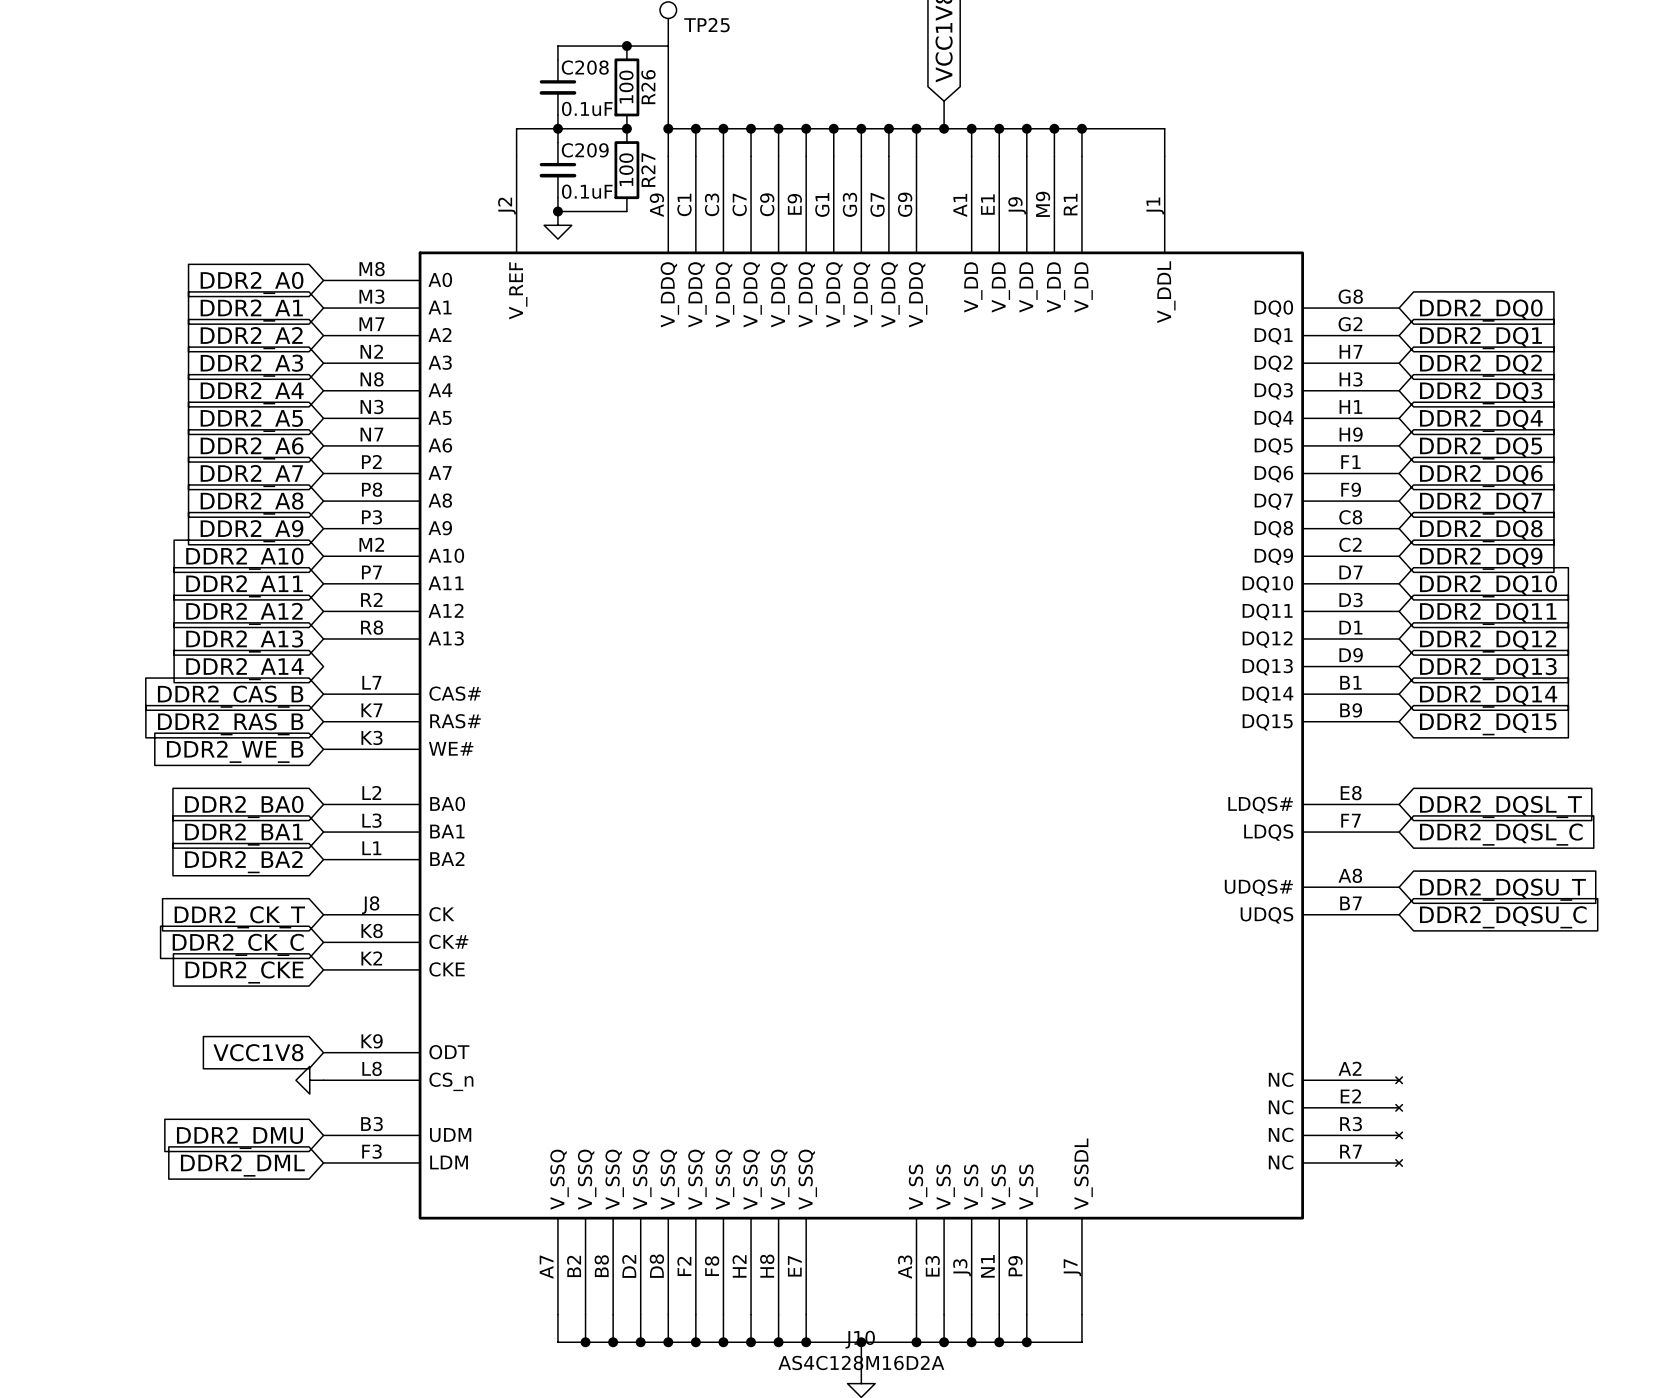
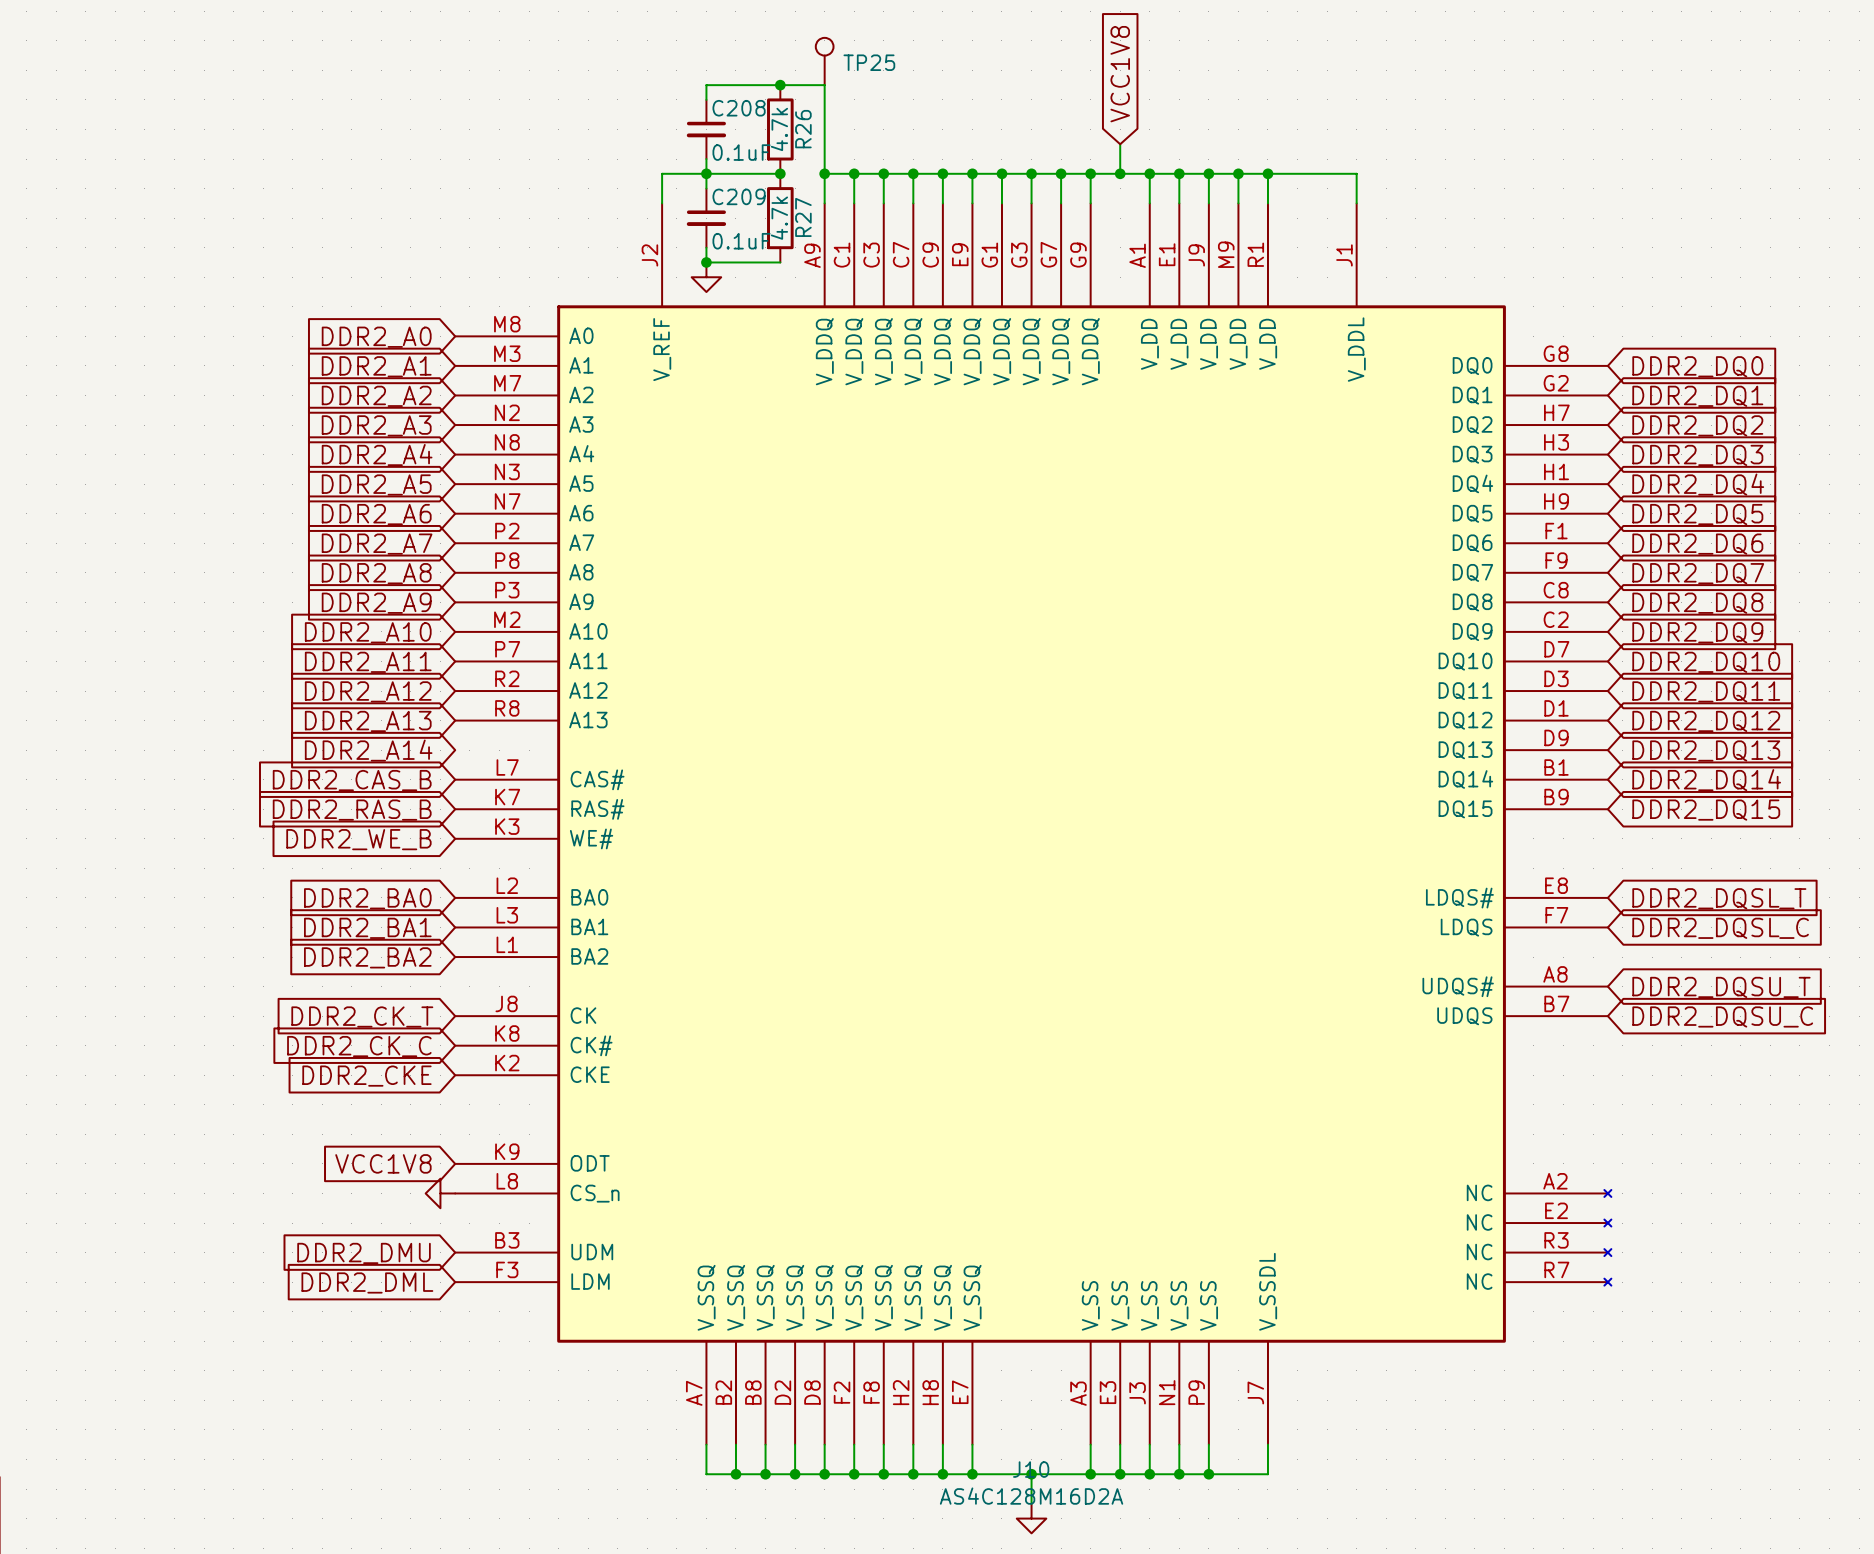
R26 value: 100 (626, 86) -> 4.7k (779, 129)
R27 value: 100 (626, 169) -> 4.7k (779, 218)

